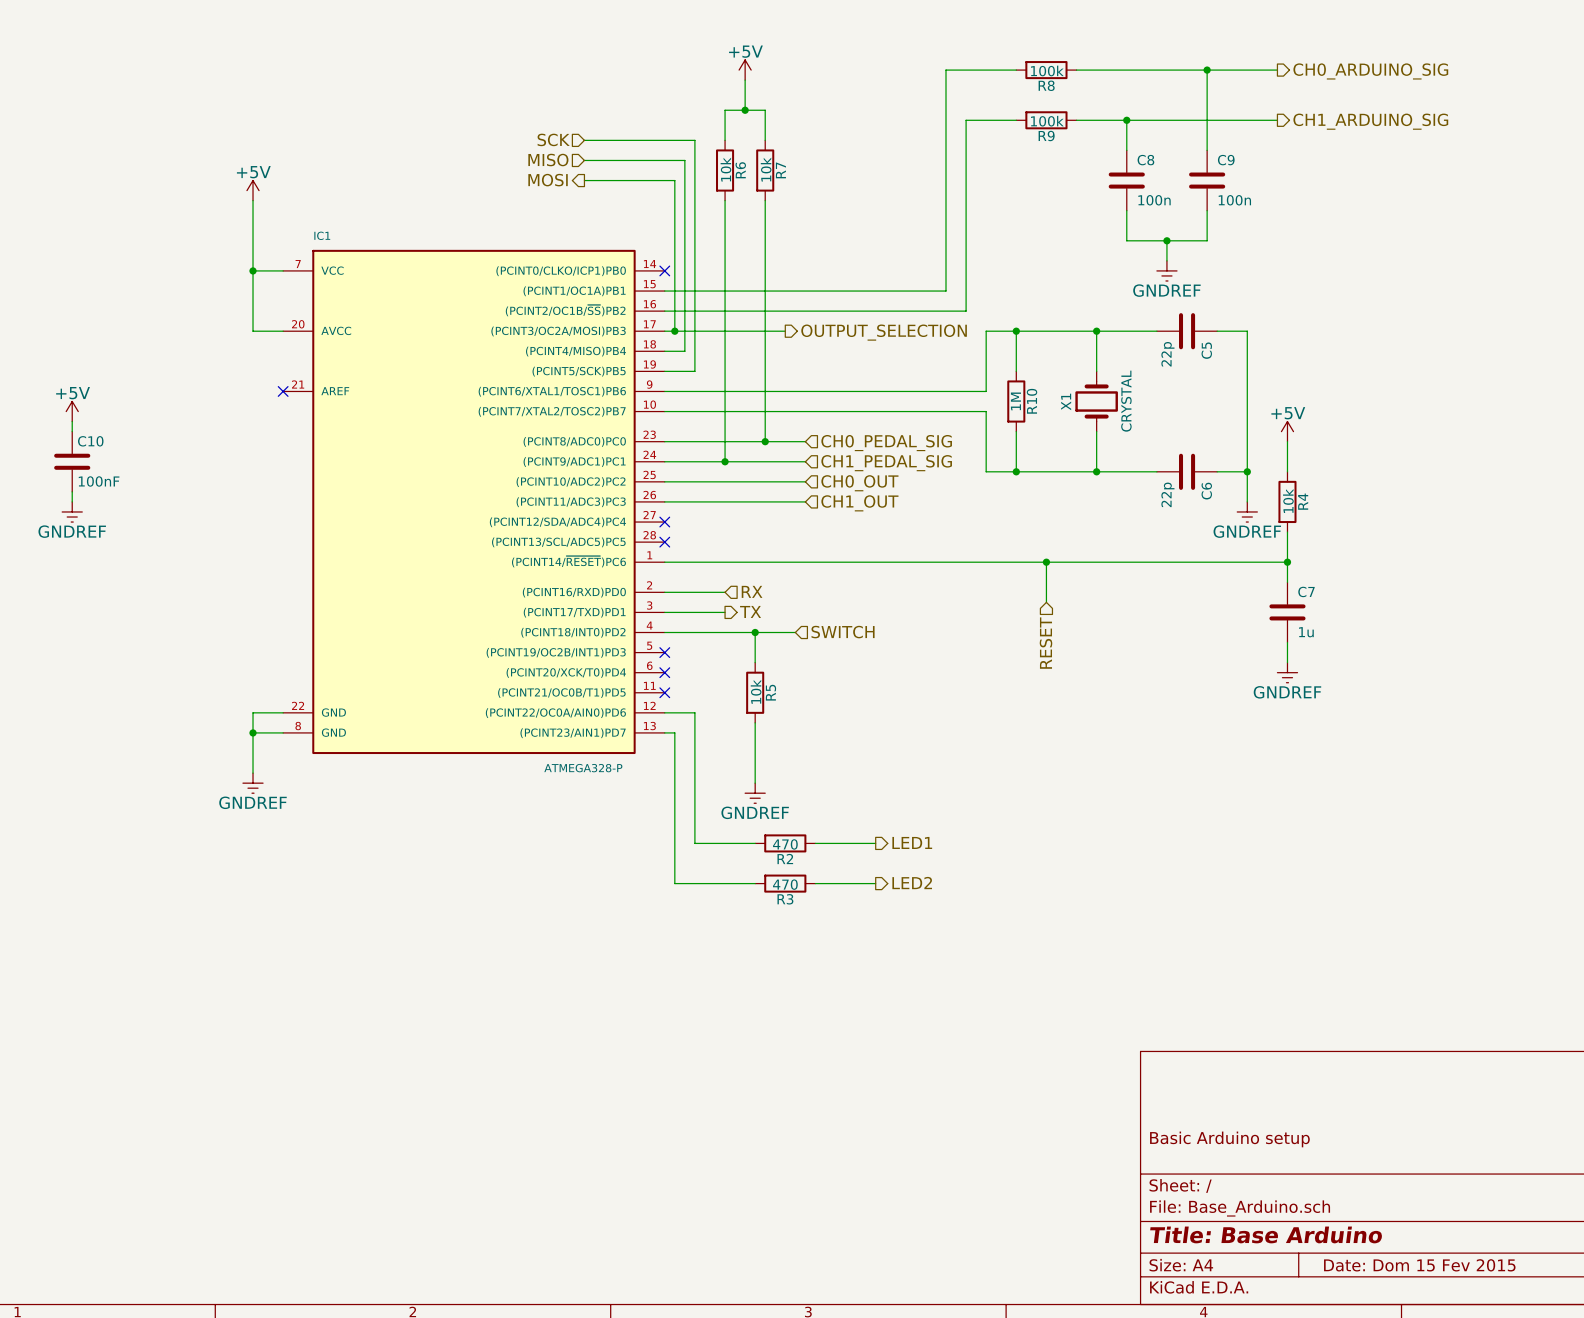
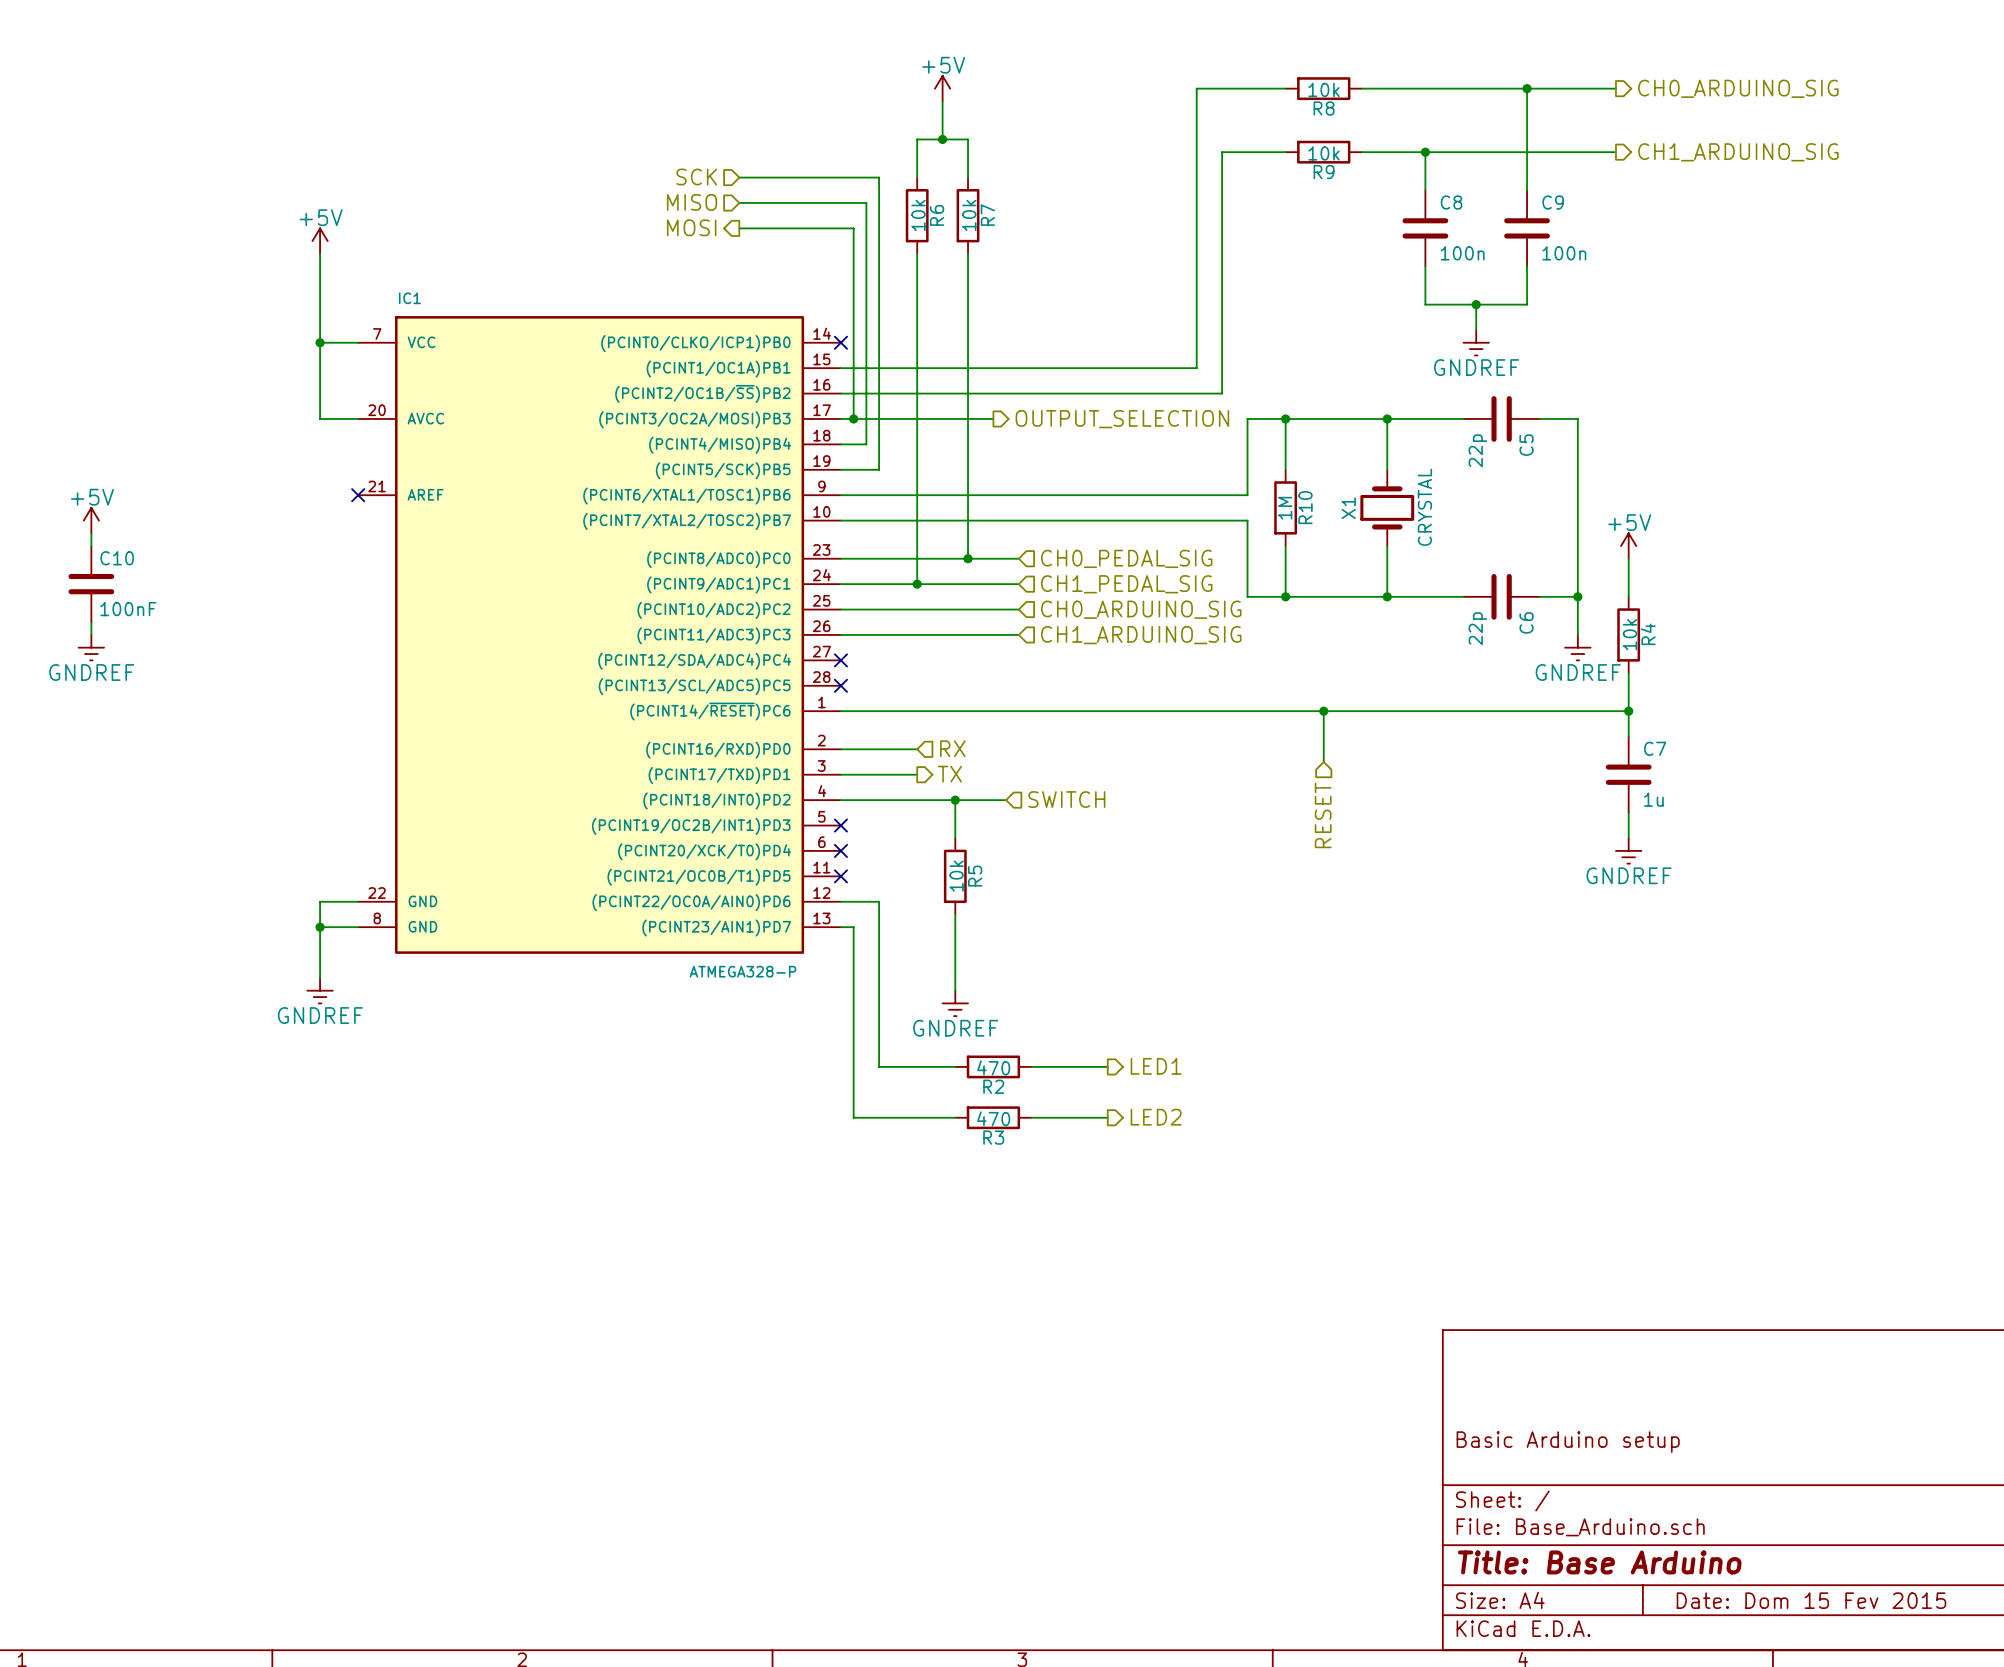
R8 value: 100k (1047, 70) -> 10k (1324, 89)
R9 value: 100k (1047, 121) -> 10k (1324, 153)
hierarchical label: CH0_OUT (859, 483) -> CH0_ARDUINO_SIG (1141, 609)
hierarchical label: CH1_OUT (859, 503) -> CH1_ARDUINO_SIG (1141, 635)

